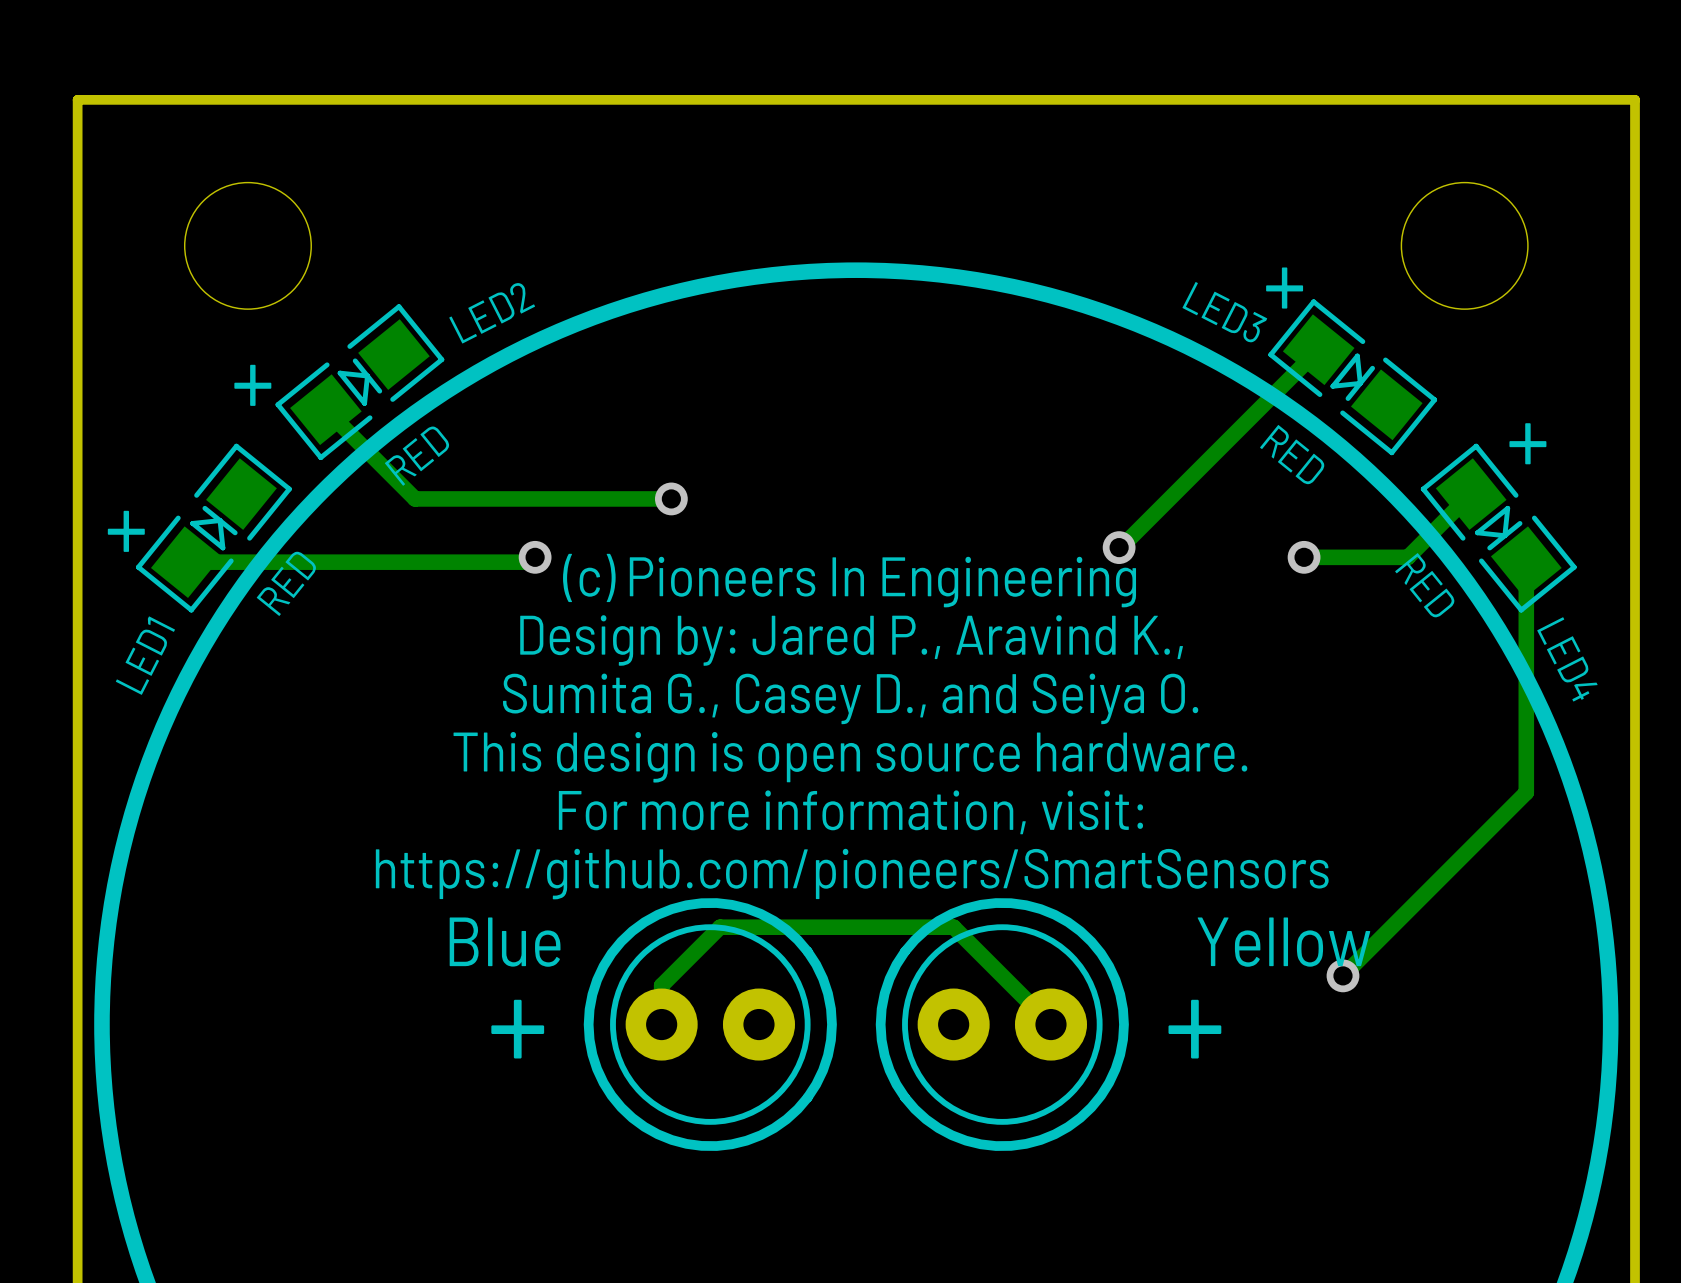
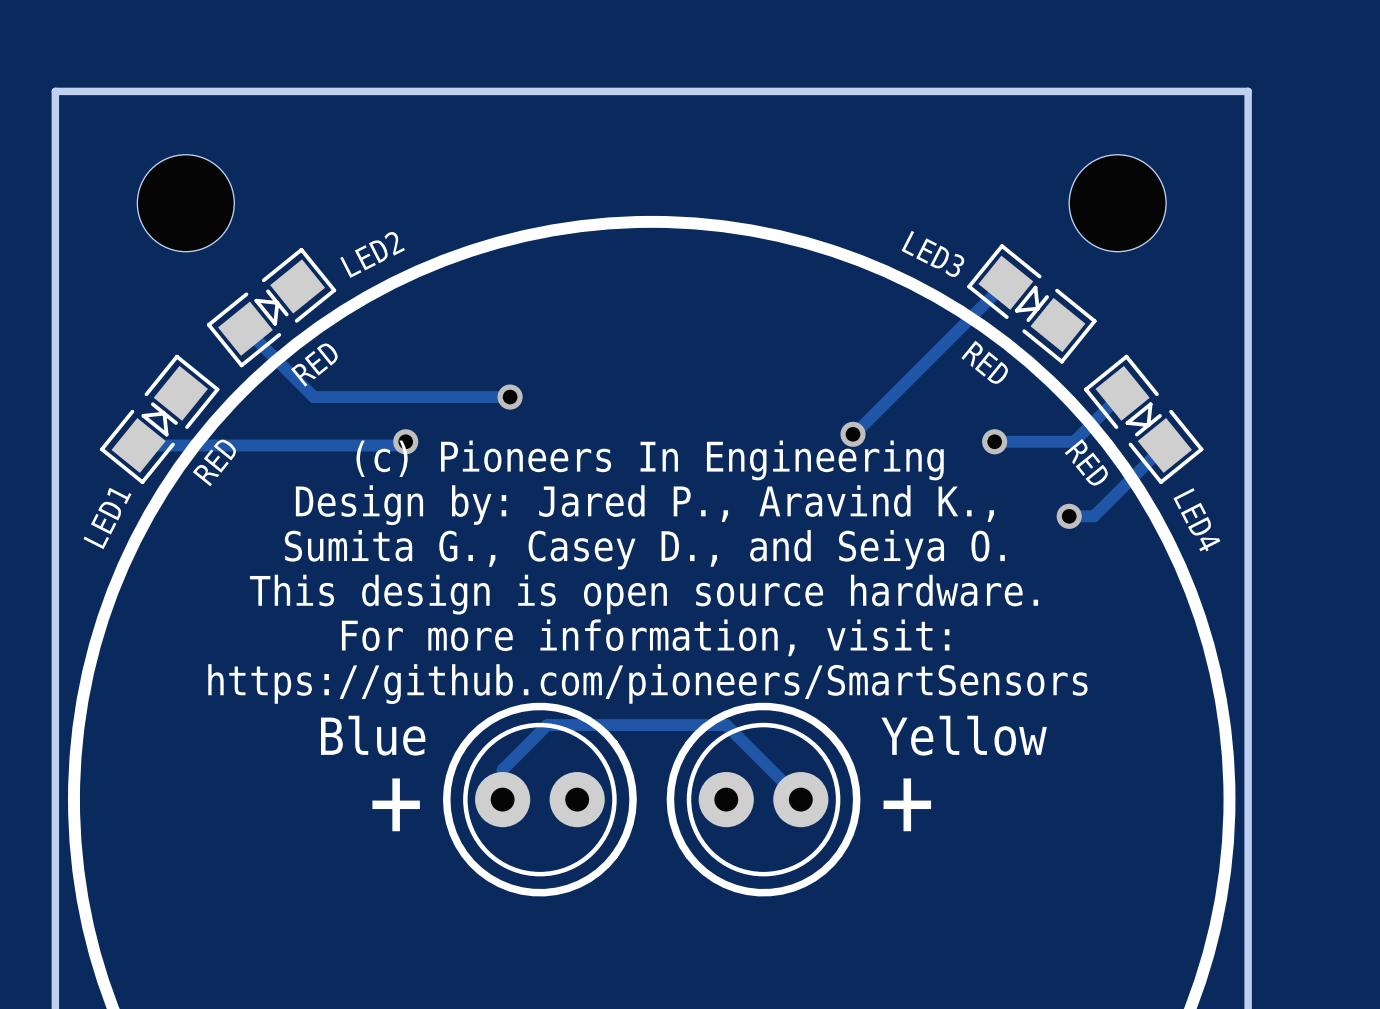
text: + (1284, 288) -> none
text: + (252, 385) -> none
text: + (1527, 443) -> none
text: + (126, 531) -> none
track: (1526, 562) (1526, 792) (1342, 975) -> (1164, 445) (1094, 516) (1069, 516)
via: none -> (1069, 516)
via: (1342, 975) -> none

